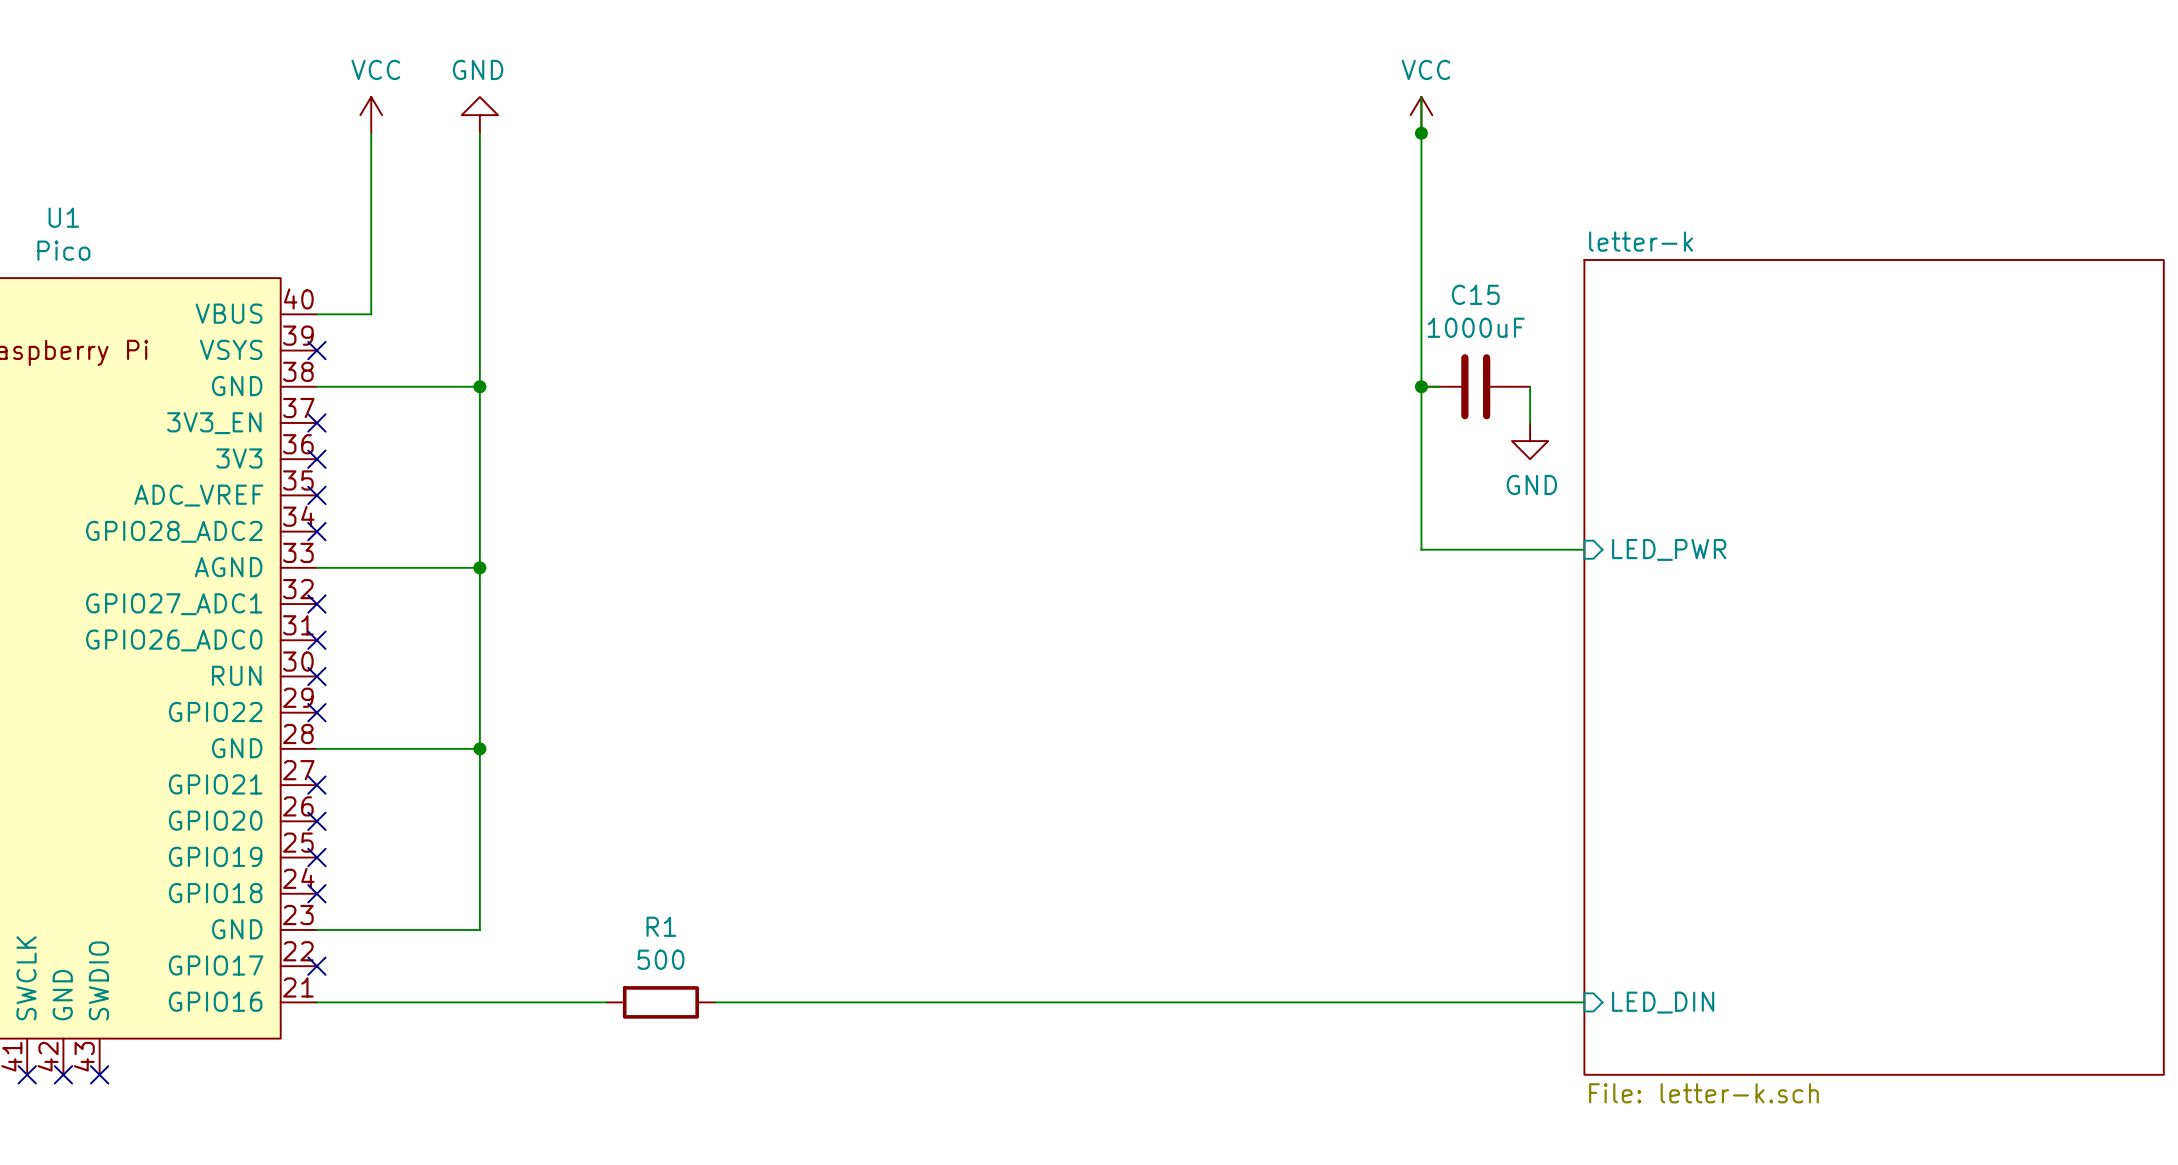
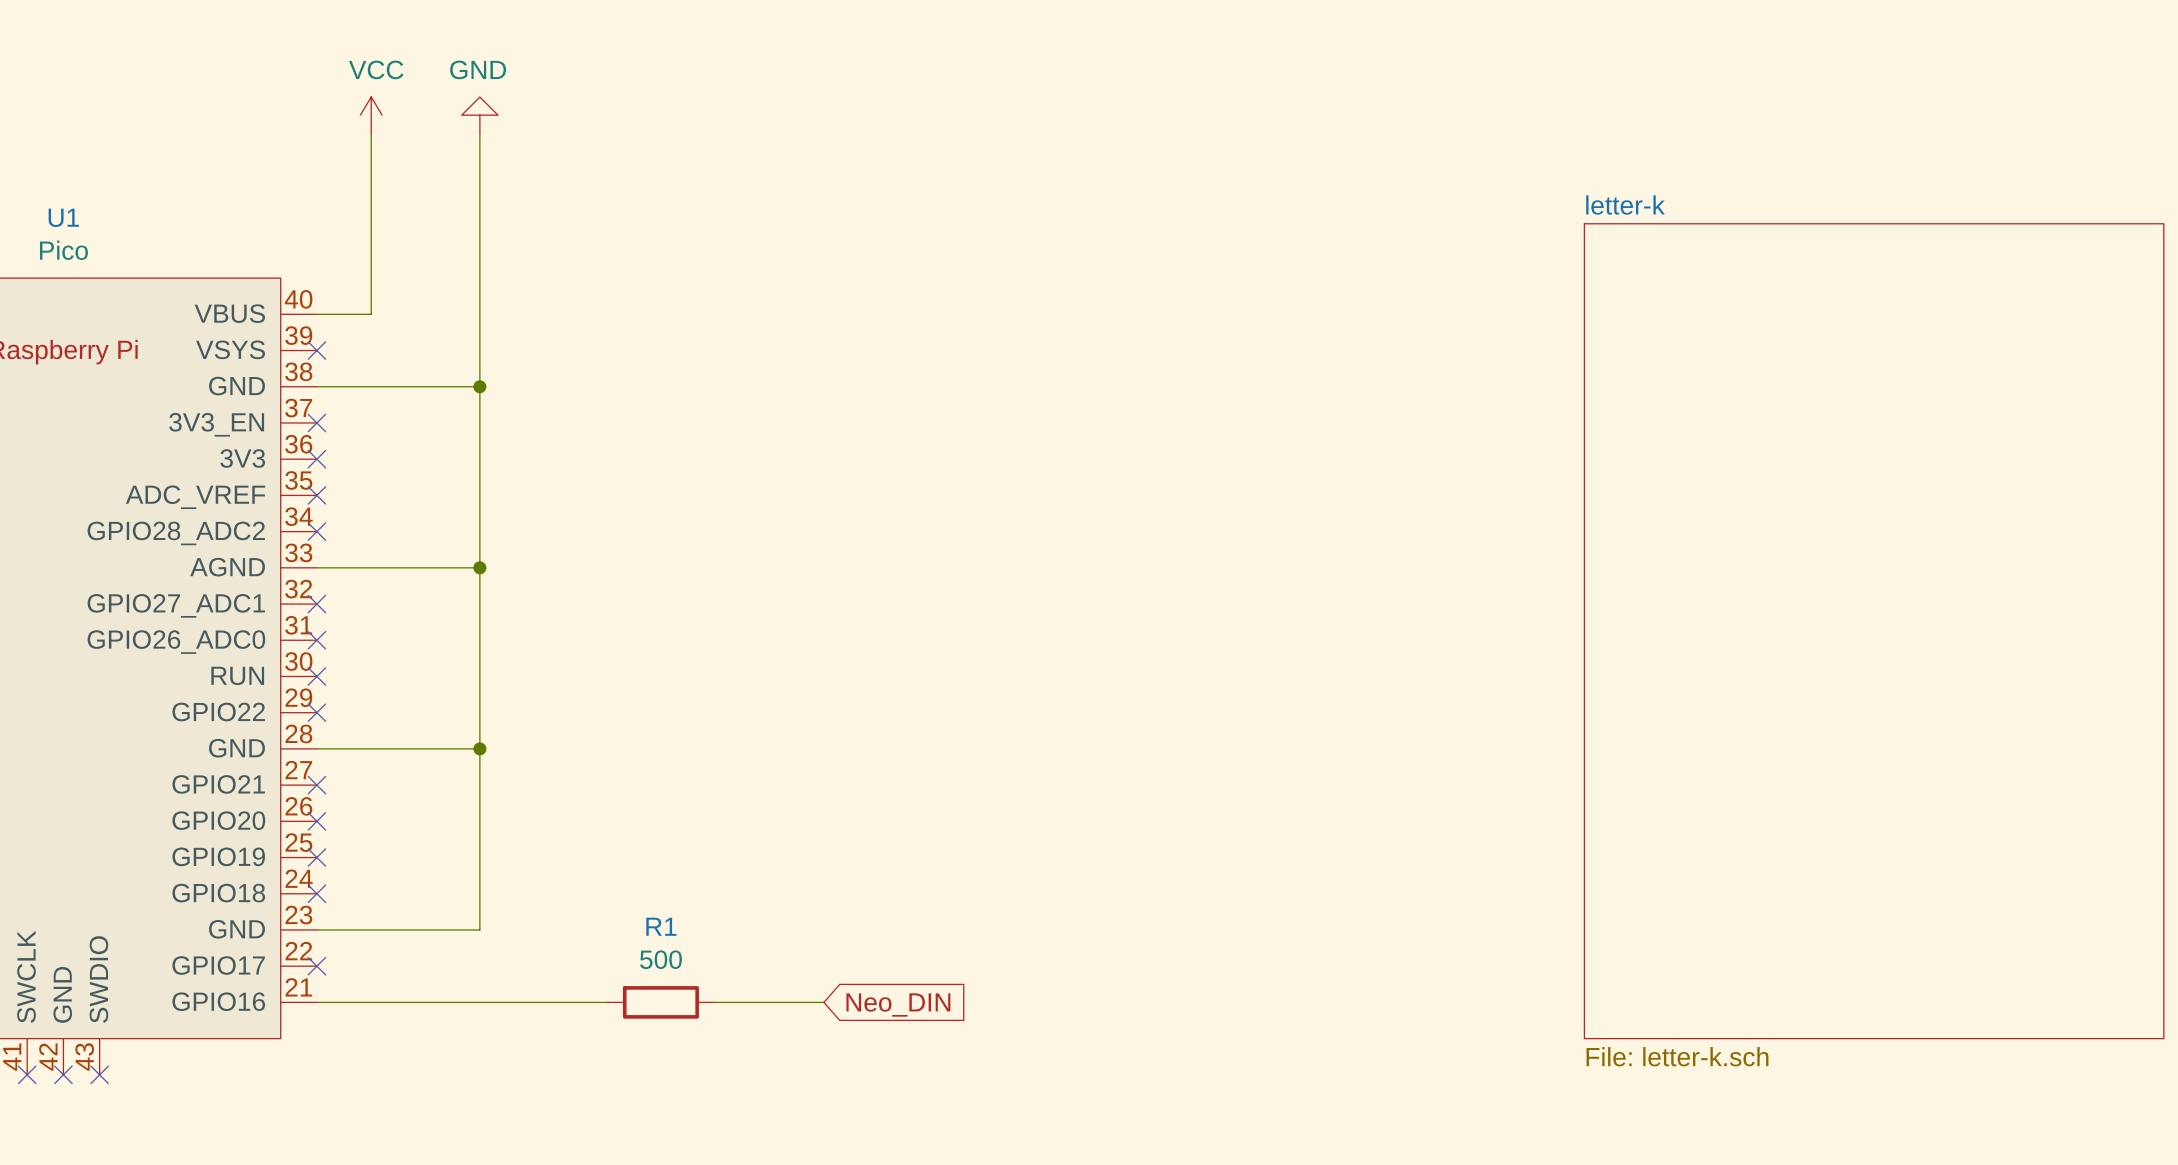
wire: (1421, 97) (1421, 549) (1584, 549) -> none
power symbol: VCC (1421, 115) -> none
junction: (1421, 133) -> none
wire: (1421, 386) (1439, 386) -> none
junction: (1421, 386) -> none
C15: 1000uF (1475, 386) -> none
wire: (1530, 386) (1530, 422) -> none
power symbol: GND (1530, 441) -> none
sheet pin: LED_PWR (1669, 549) -> none
sheet letter-k position: (1874, 667) -> (1874, 631)
wire: (823, 1002) (1584, 1002) -> none
sheet pin: LED_DIN (1663, 1002) -> none
global label: none -> Neo_DIN (898, 1005)

